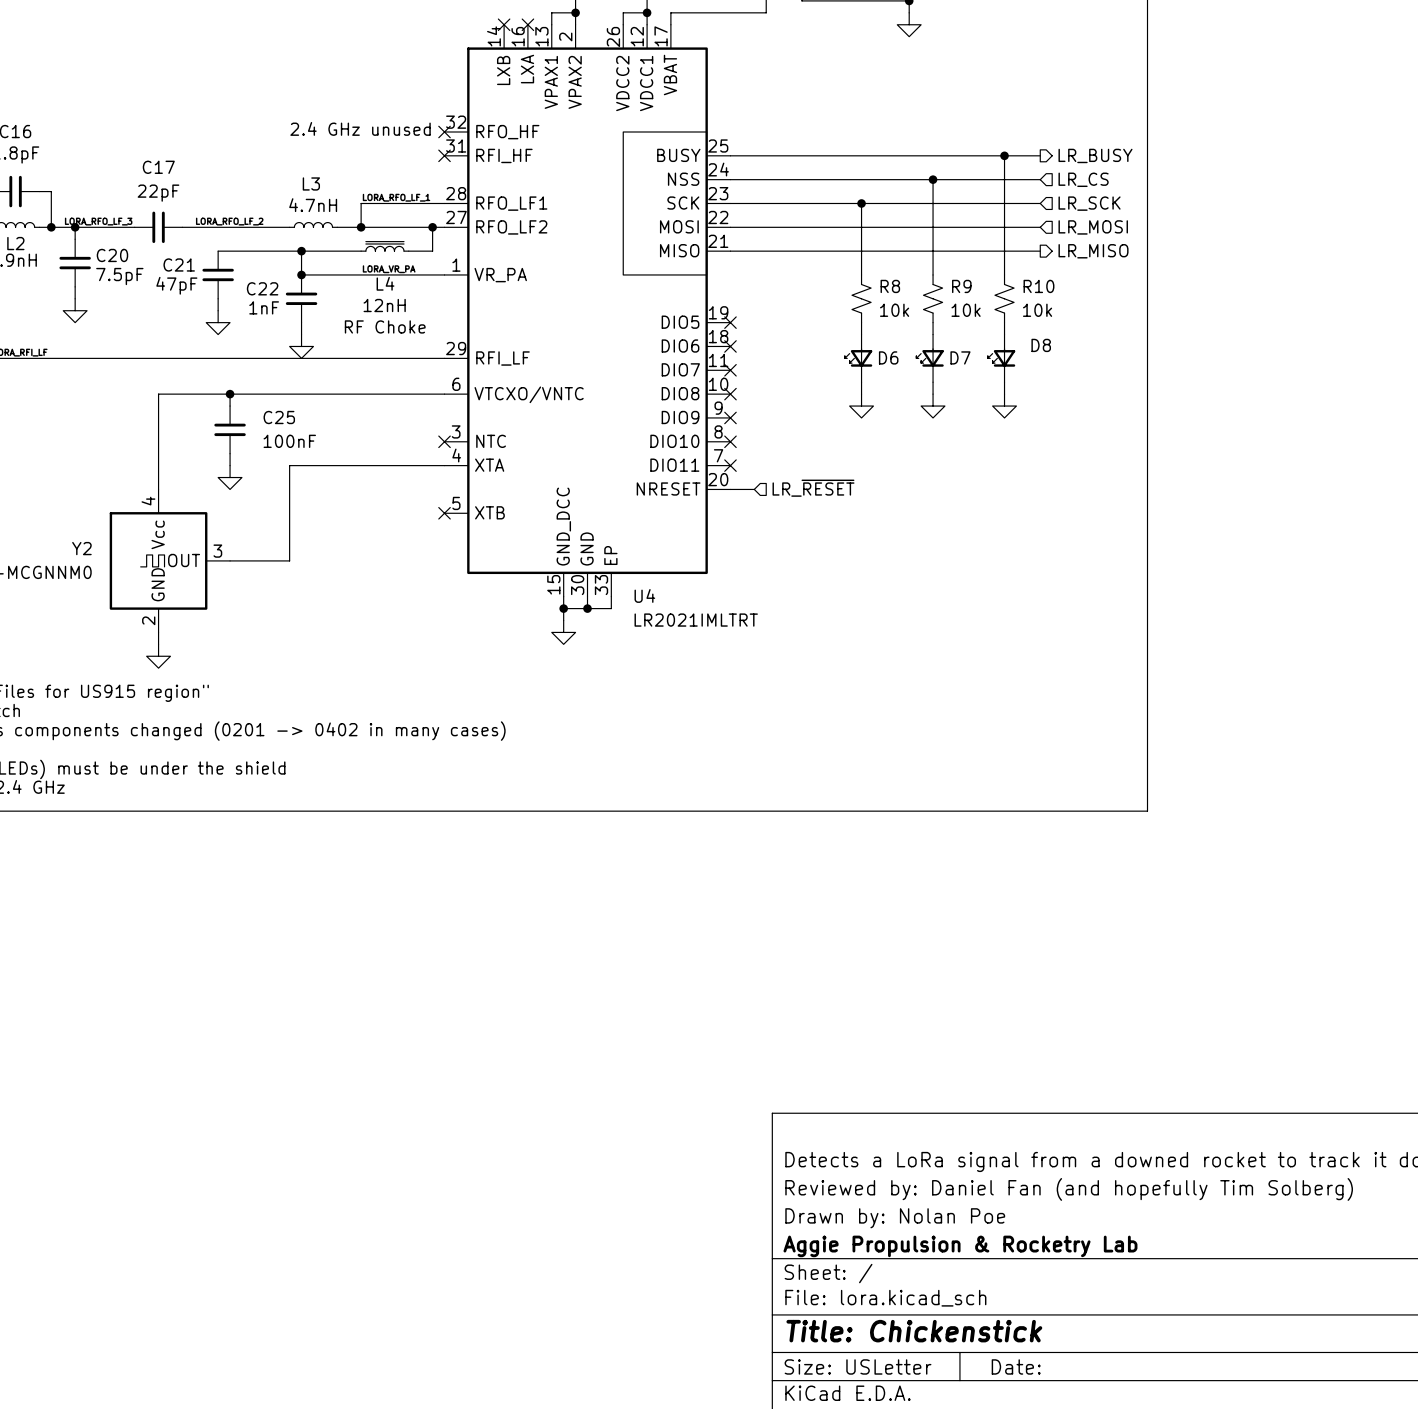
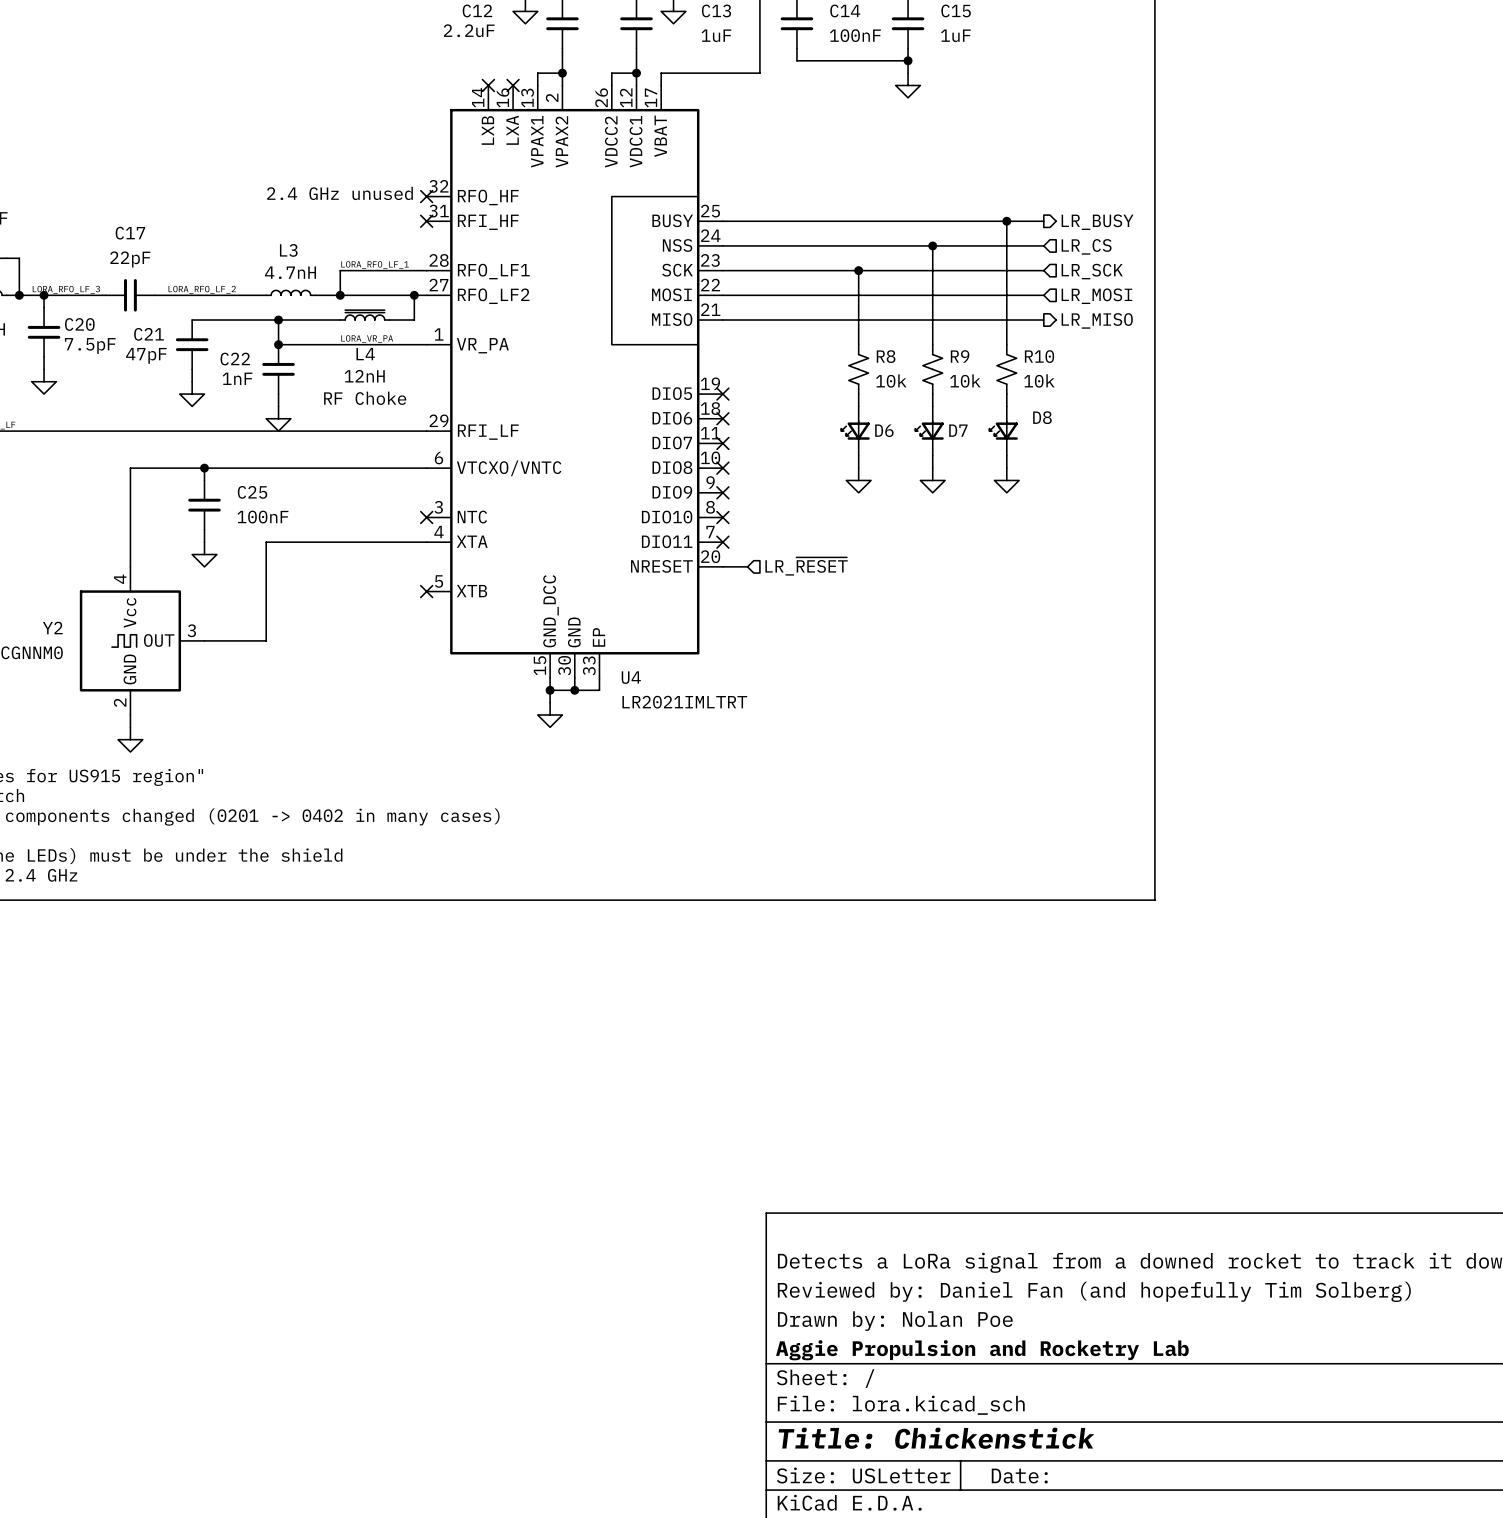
title block: Aggie Propulsion & Rocketry Lab (960, 1246) -> Aggie Propulsion and Rocketry Lab (982, 1350)

